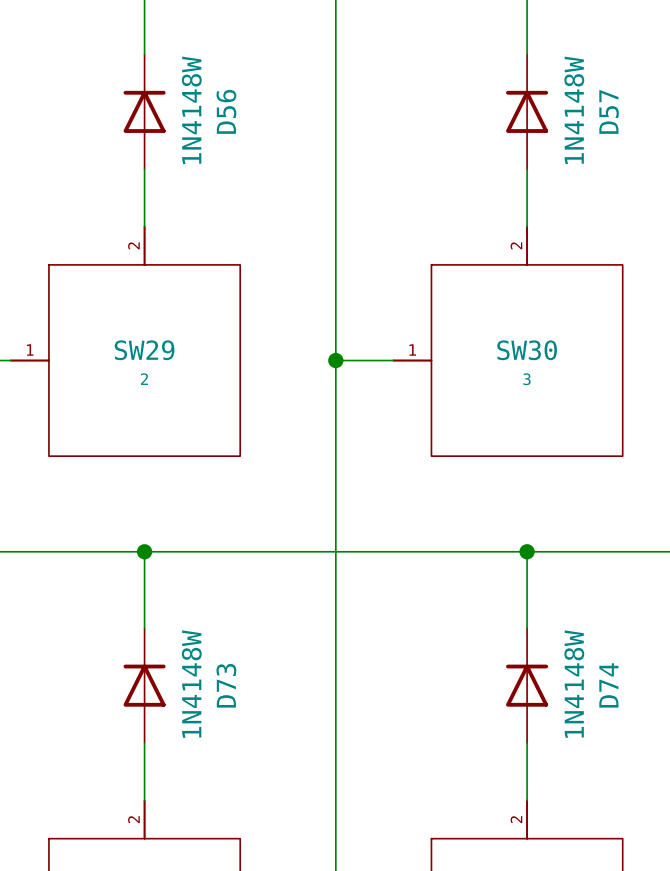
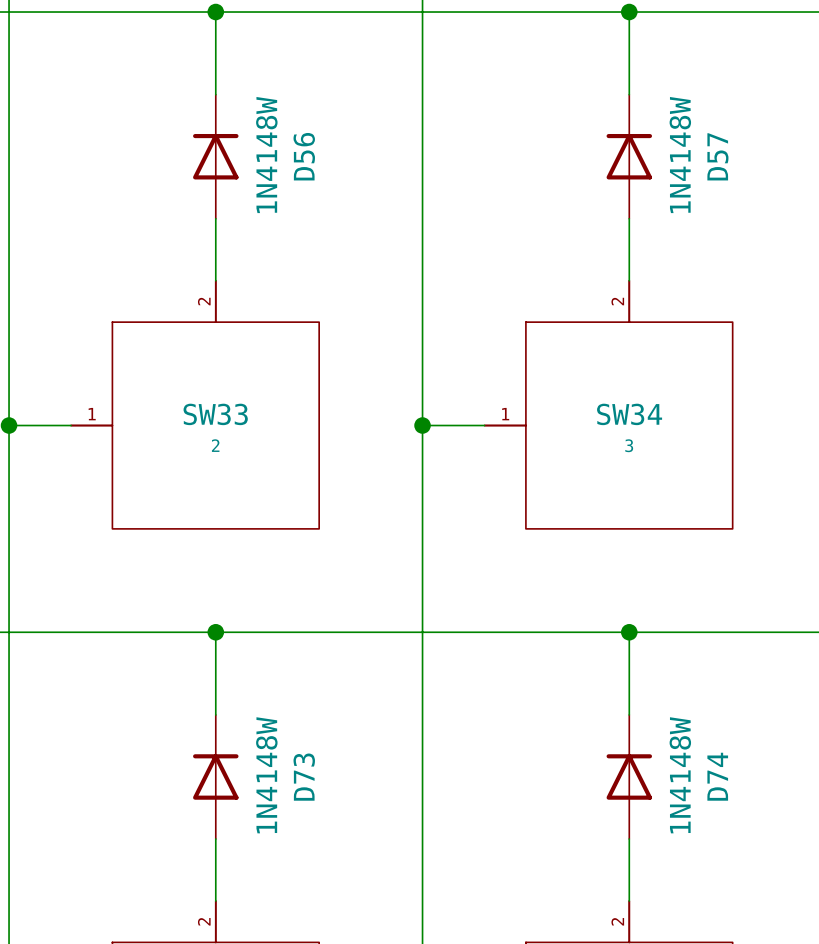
SW29 name: SW29 (144, 350) -> SW33 (215, 414)
SW30 name: SW30 (527, 350) -> SW34 (629, 414)

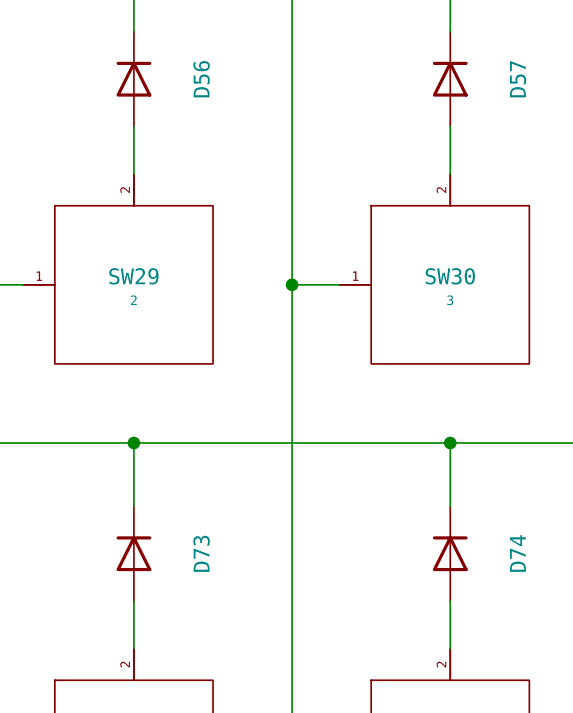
D56 value: 1N4148W (266, 155) -> none
D57 value: 1N4148W (680, 155) -> none
SW33 name: SW33 (215, 414) -> SW29 (133, 276)
SW34 name: SW34 (629, 414) -> SW30 (450, 276)
D73 value: 1N4148W (266, 775) -> none
D74 value: 1N4148W (680, 775) -> none

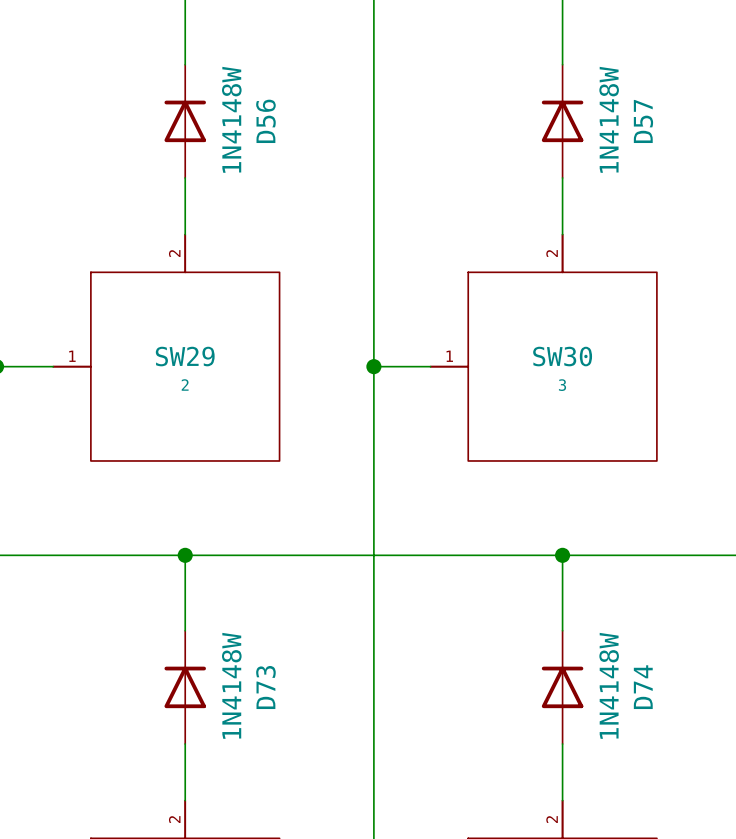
D56 value: none -> 1N4148W (231, 119)
D57 value: none -> 1N4148W (609, 119)
D73 value: none -> 1N4148W (231, 685)
D74 value: none -> 1N4148W (609, 685)

